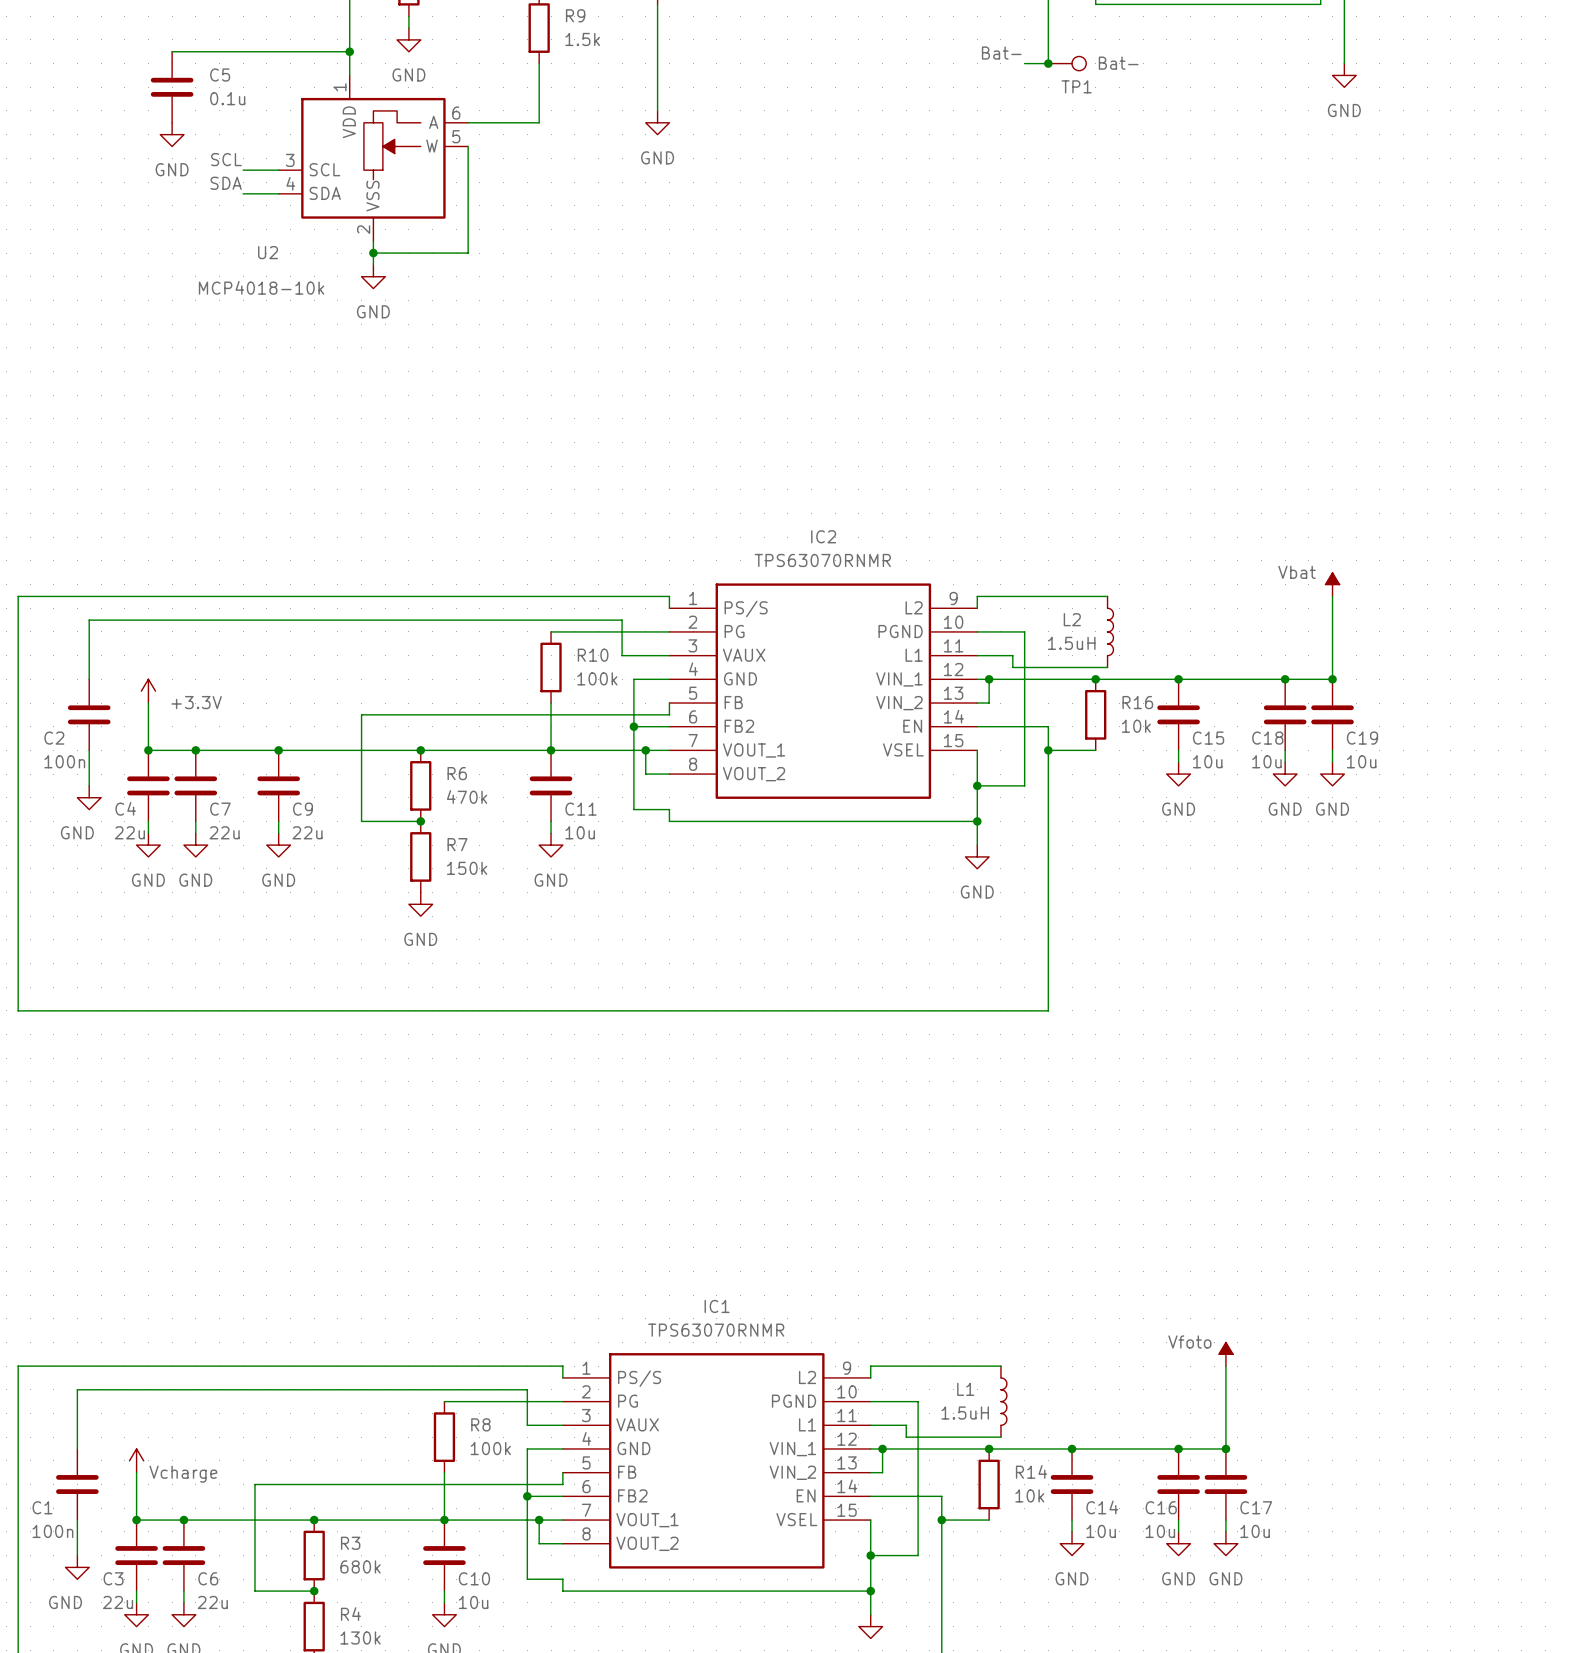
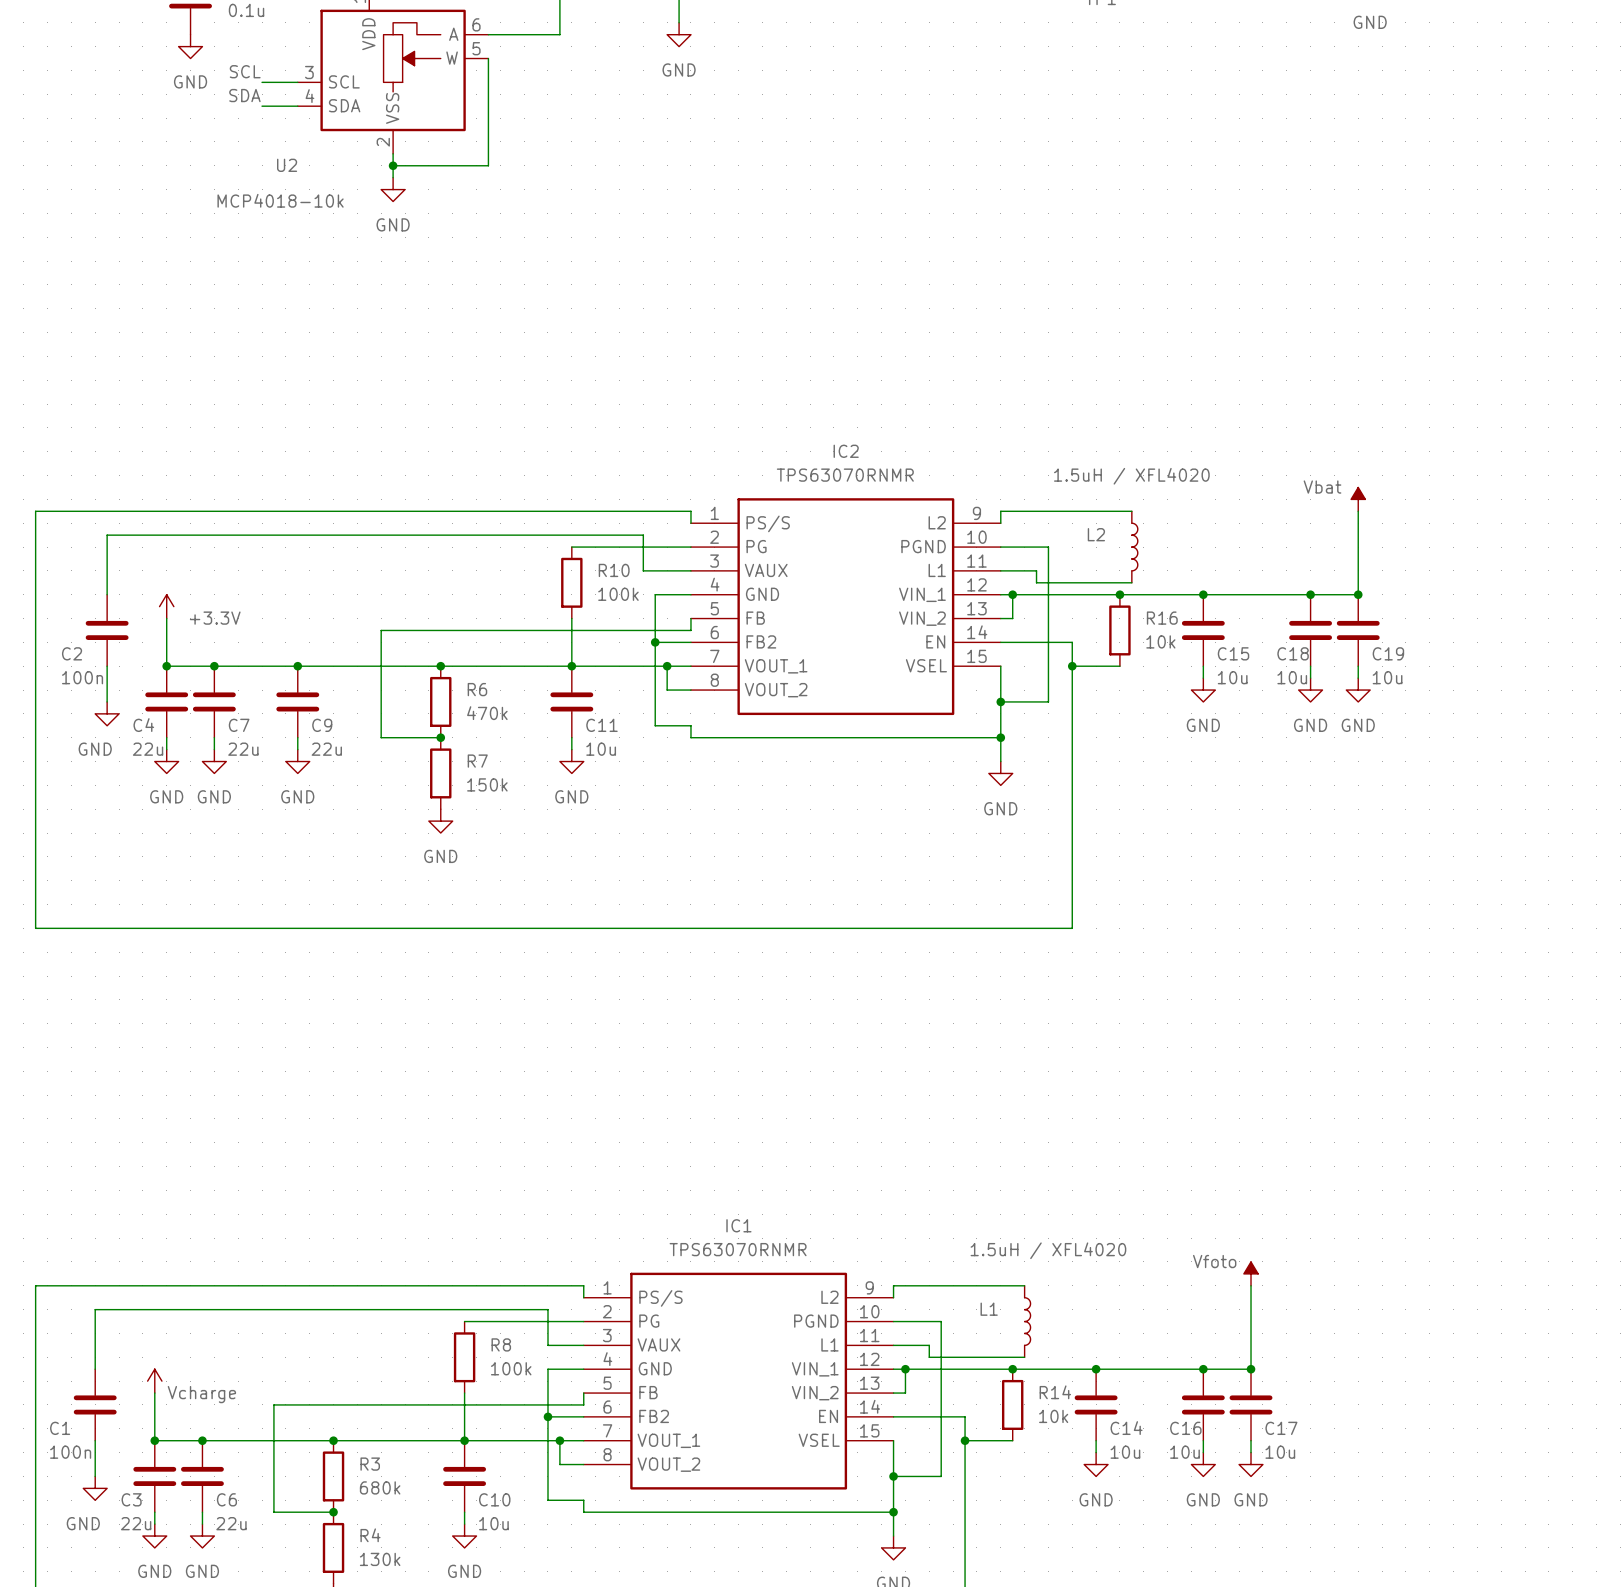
L2 value: 1.5uH (1071, 643) -> 1.5uH / XFL4020 (1131, 476)
L1 value: 1.5uH (965, 1413) -> 1.5uH / XFL4020 (1048, 1250)

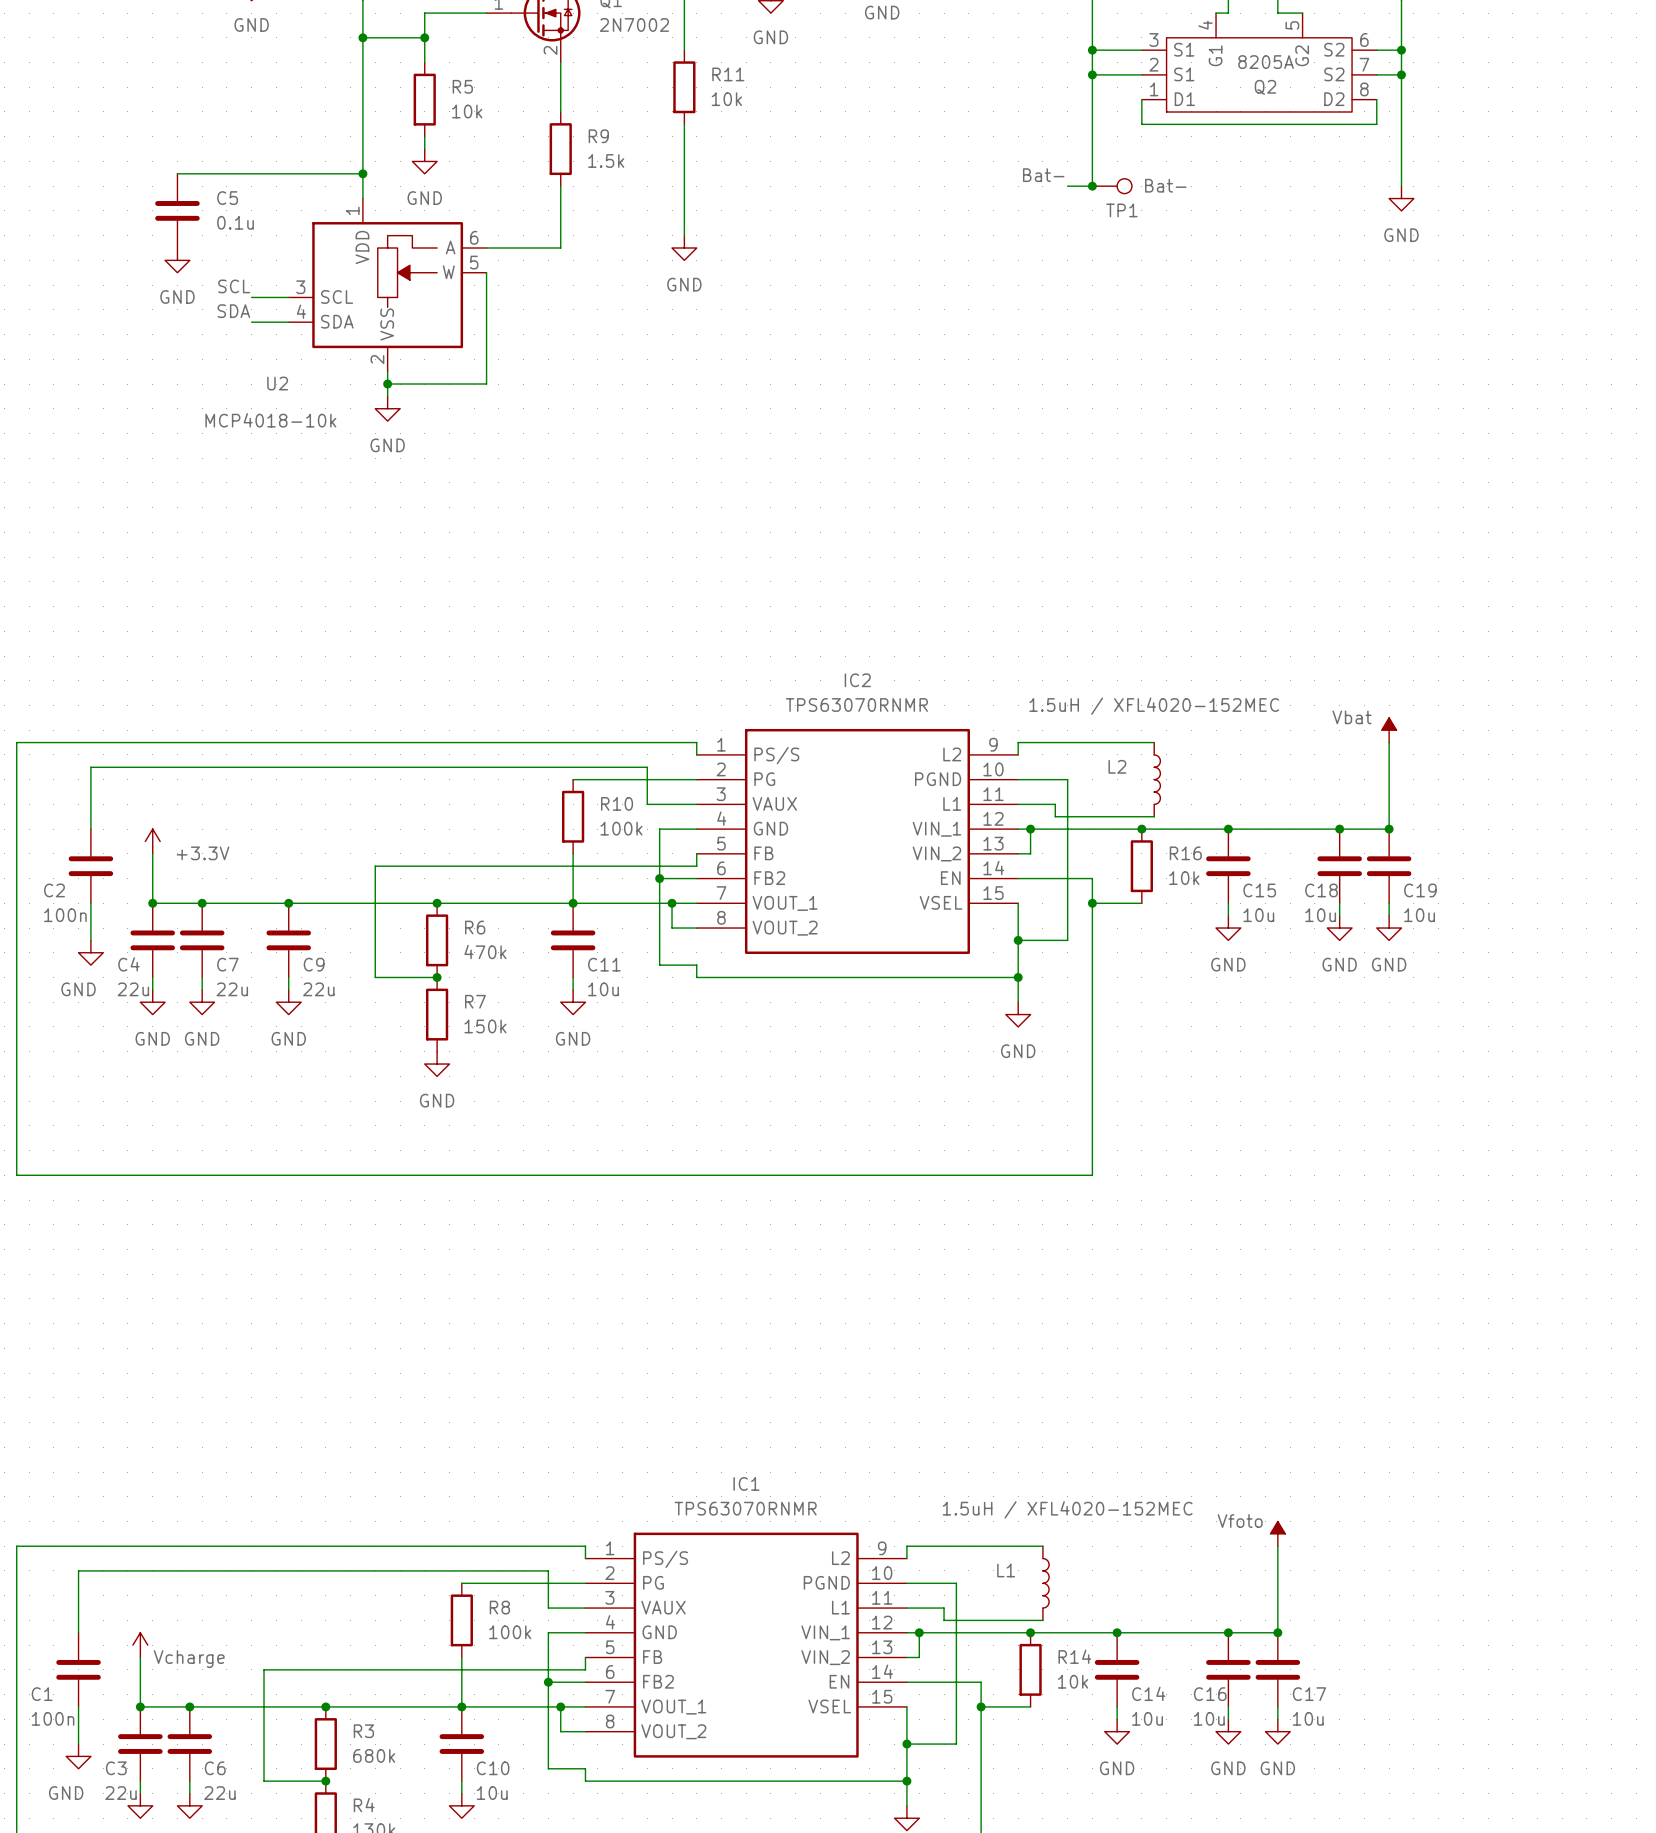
L2 value: 1.5uH / XFL4020 (1131, 476) -> 1.5uH / XFL4020-152MEC (1154, 706)
L1 value: 1.5uH / XFL4020 (1048, 1250) -> 1.5uH / XFL4020-152MEC (1067, 1509)

